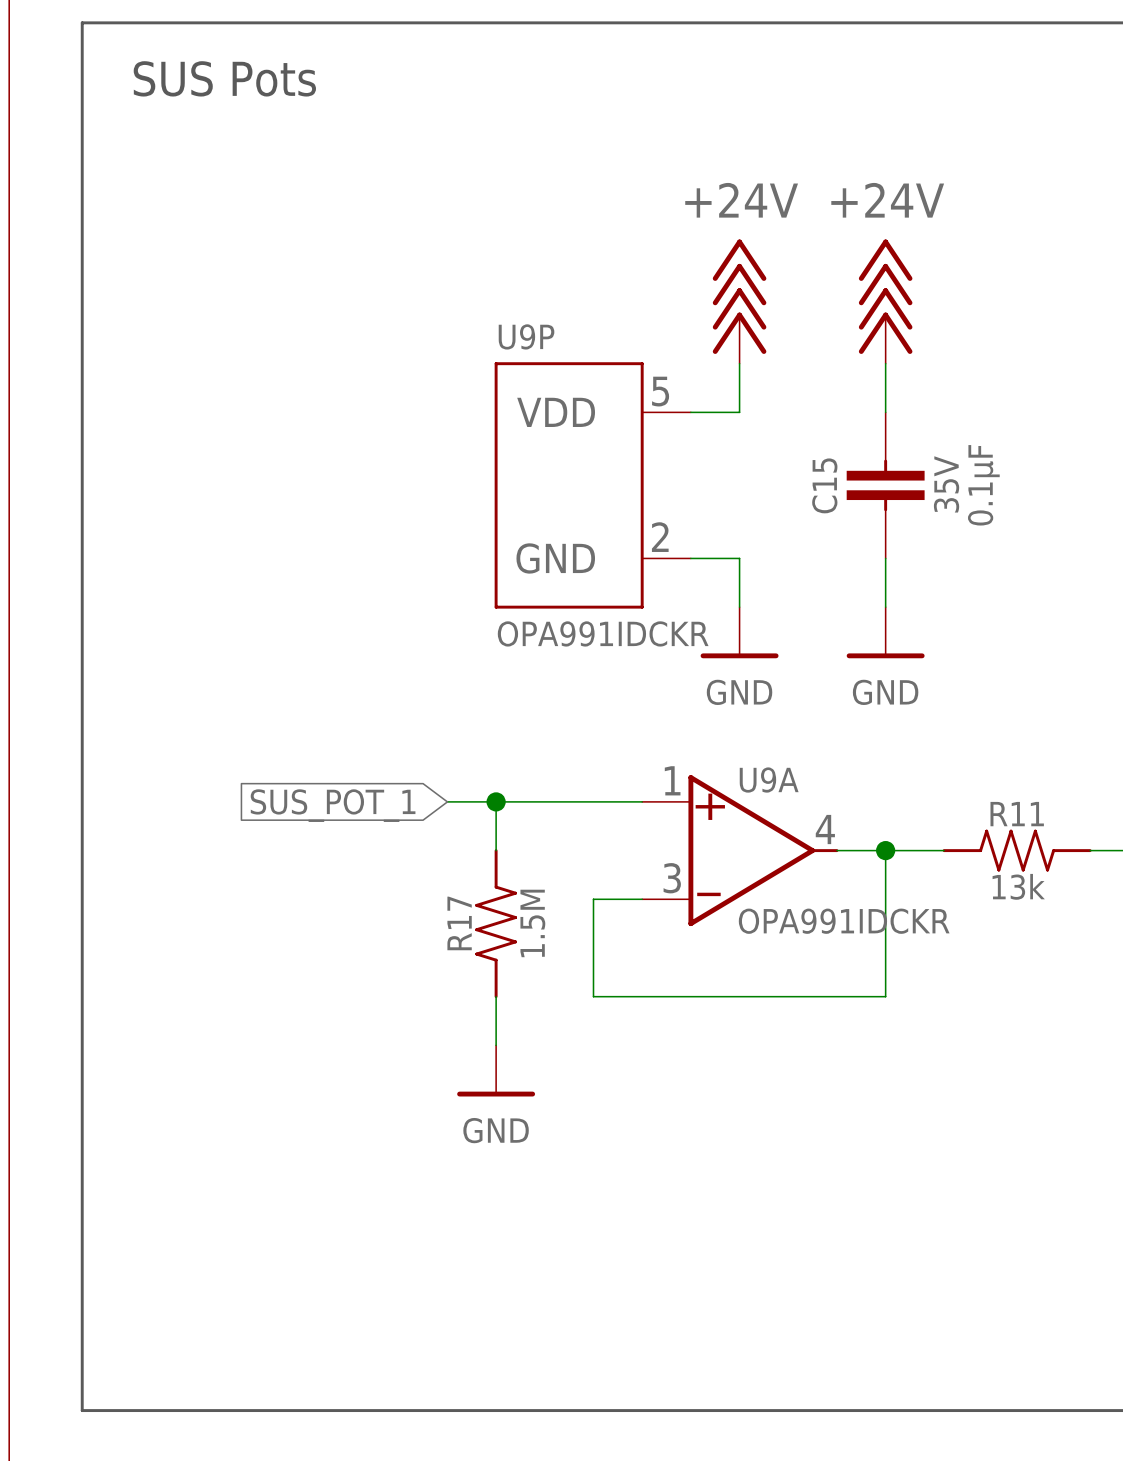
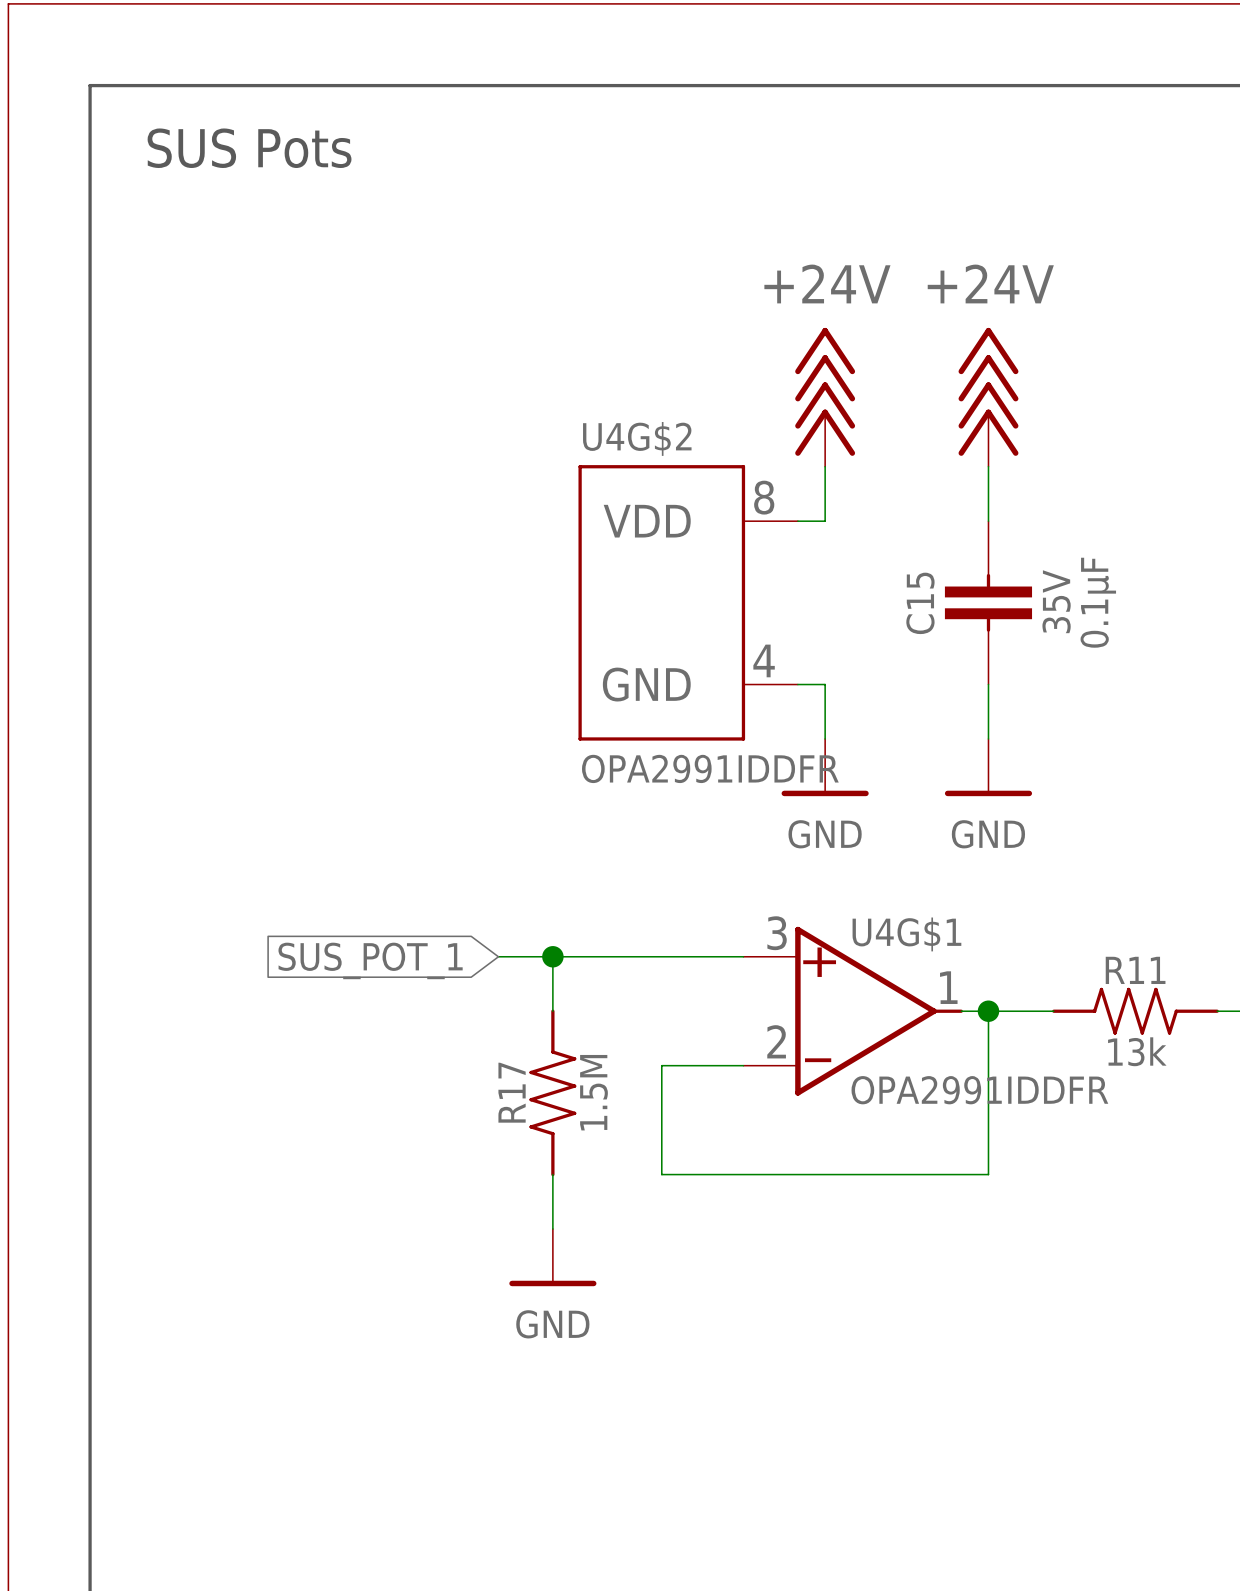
U9P: (592, 485) -> none
U4G$2: none -> (688, 602)
U9A: (740, 850) -> none
U4G$1: none -> (853, 1011)

